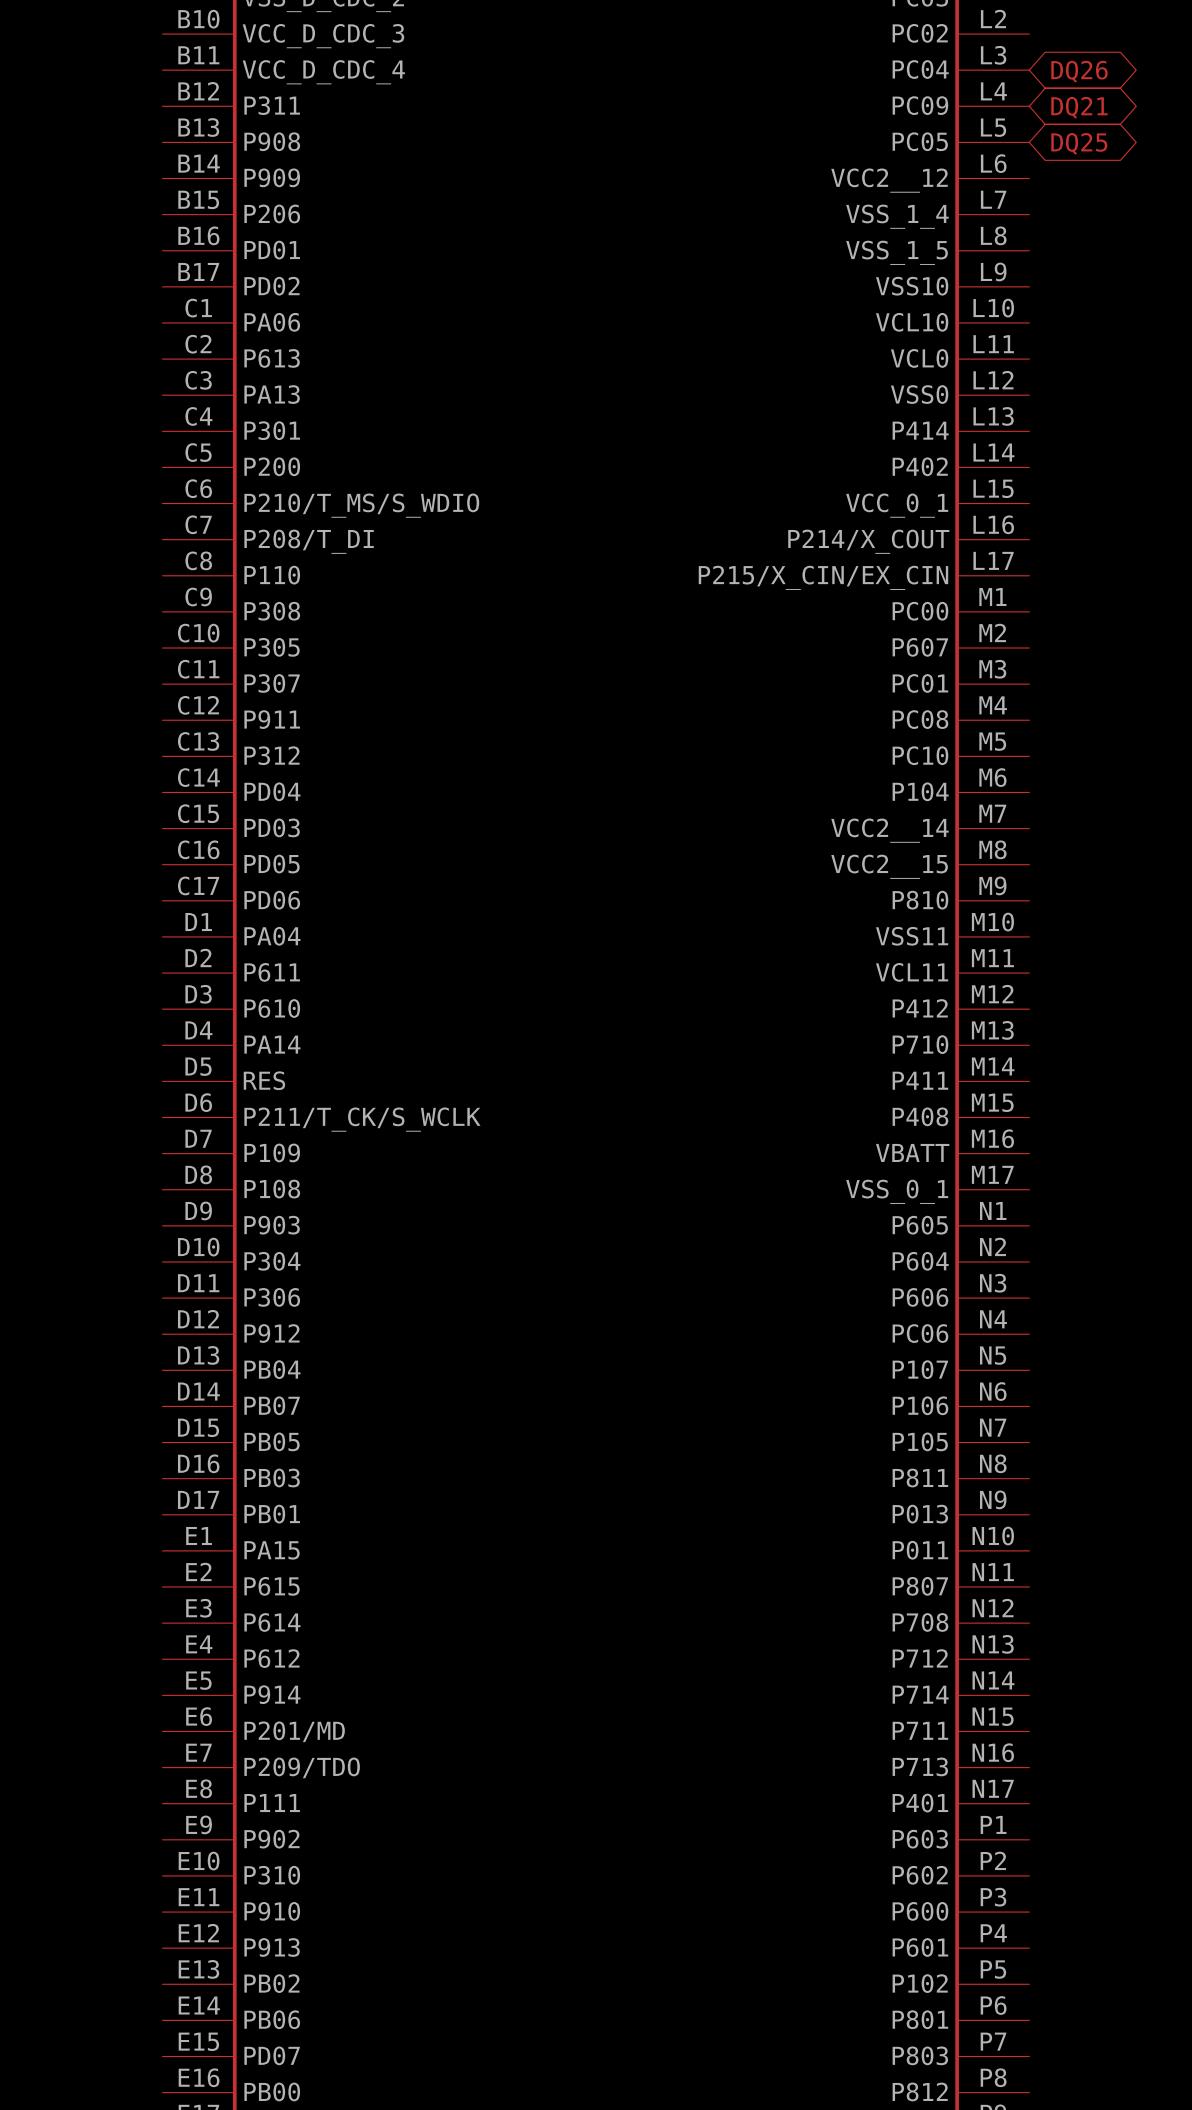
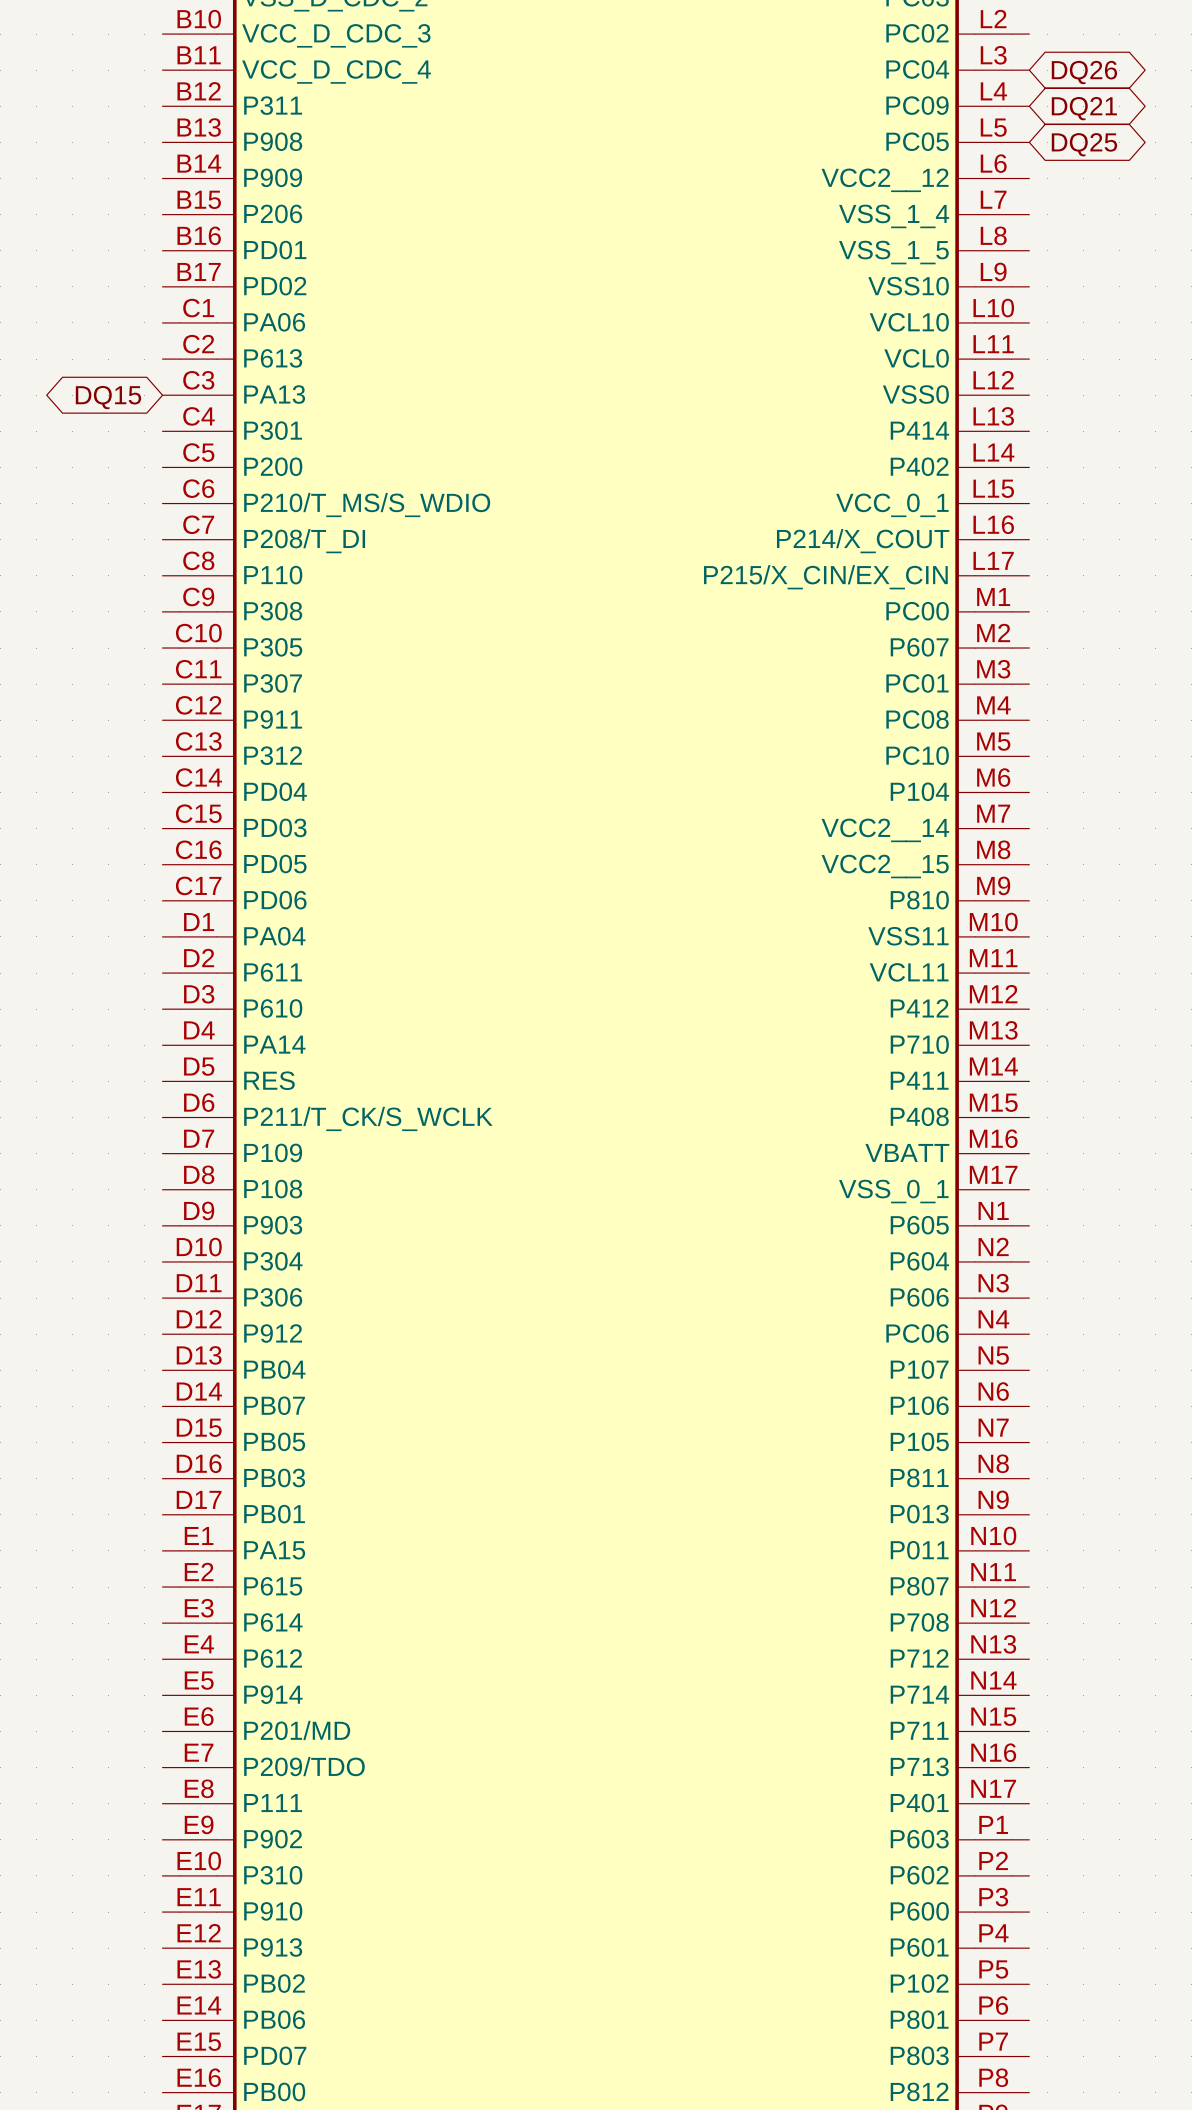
global label: none -> DQ15 (108, 397)

